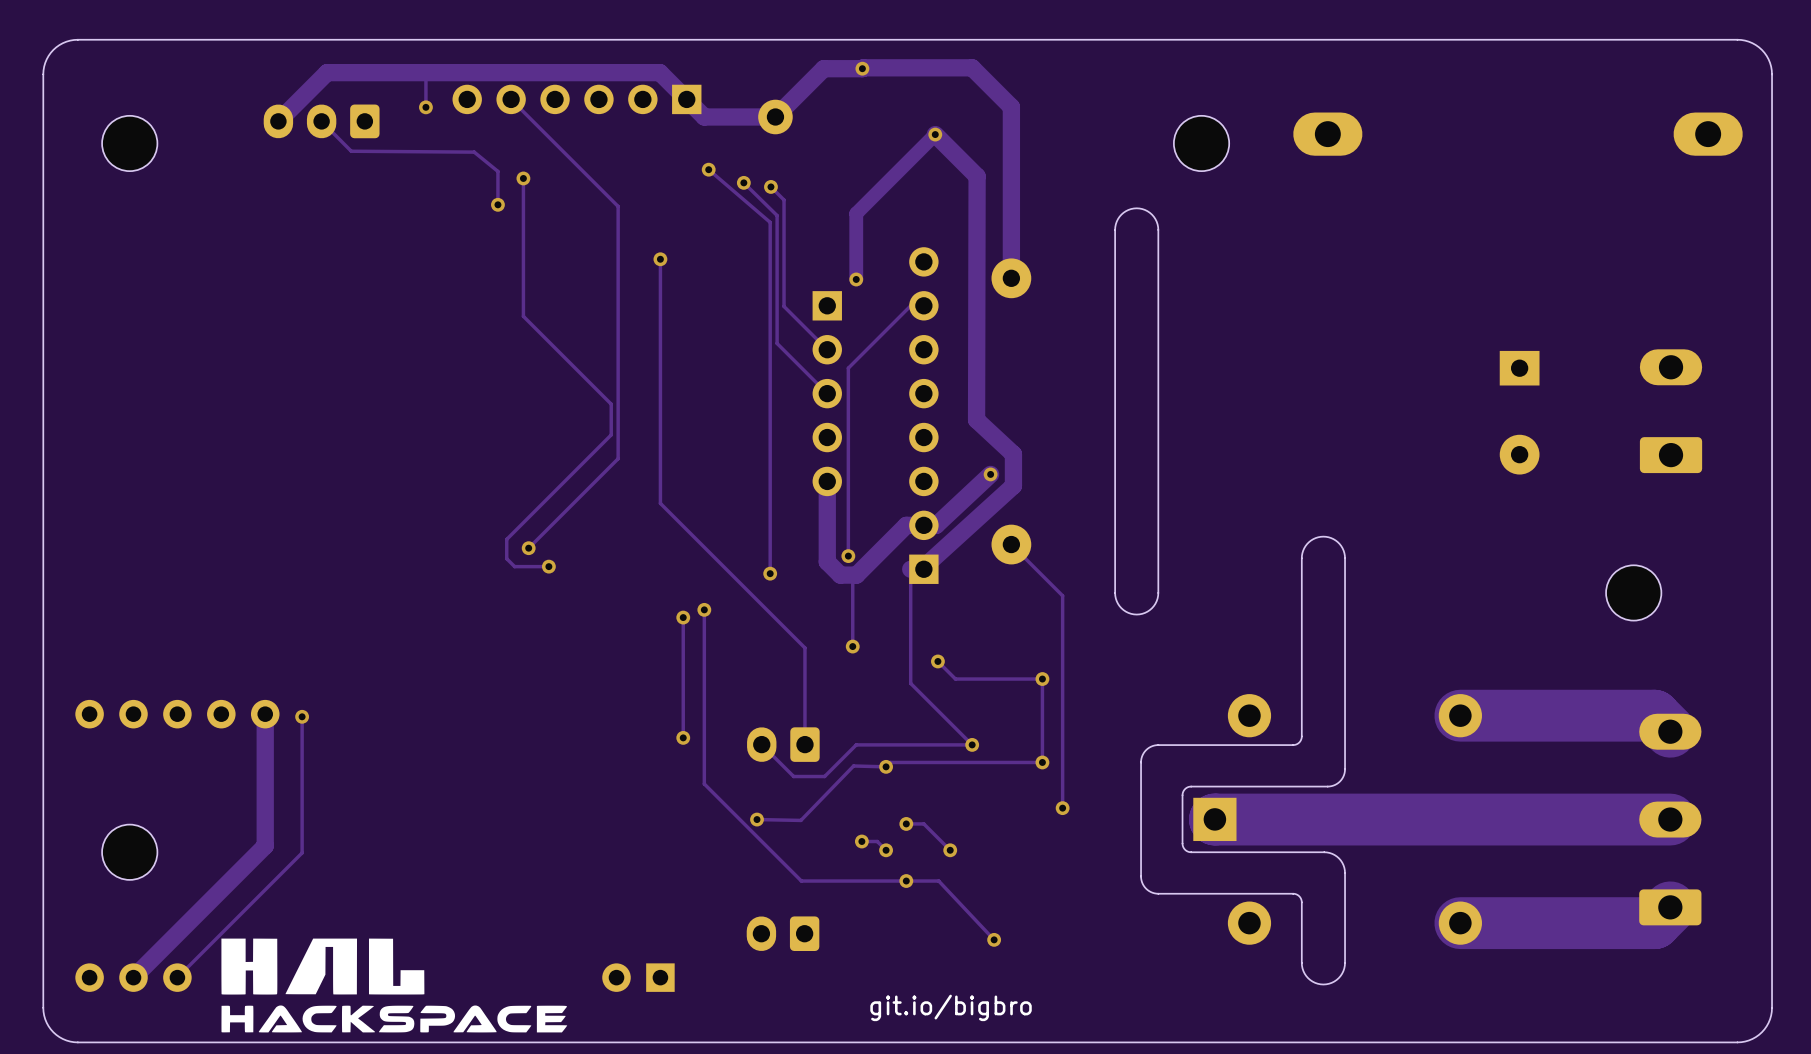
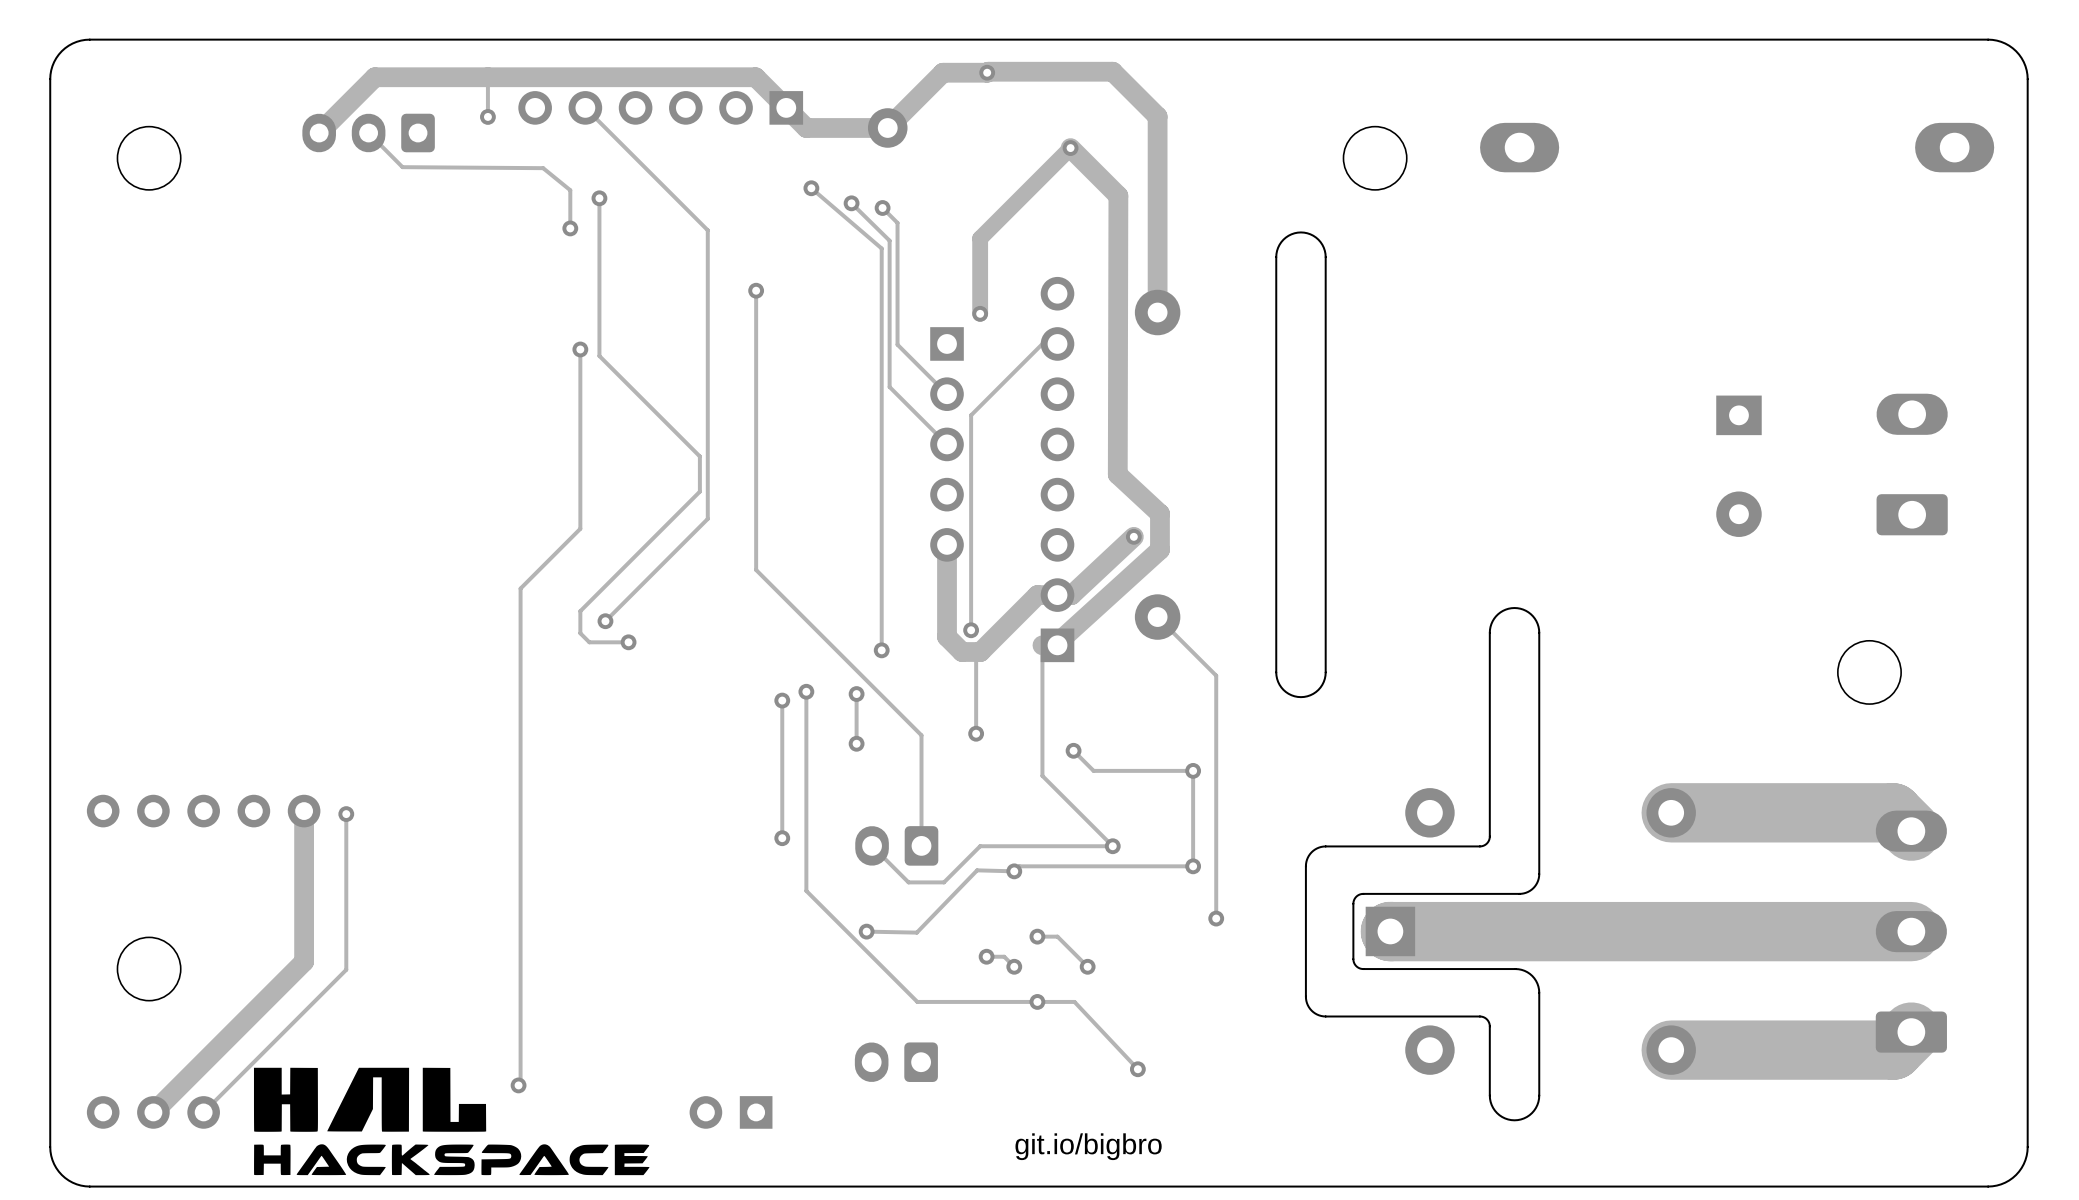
track: none -> (580, 349) (580, 528) (520, 588) (520, 1083) (518, 1085)
via: none -> (580, 349)
track: none -> (856, 694) (856, 743)
via: none -> (856, 694)
via: none -> (856, 743)
via: none -> (518, 1085)

